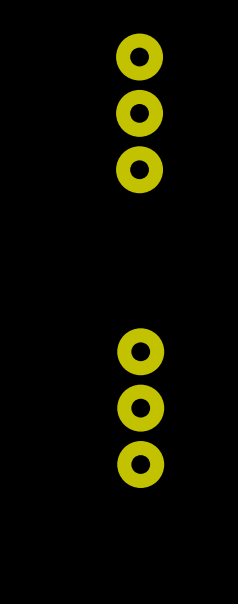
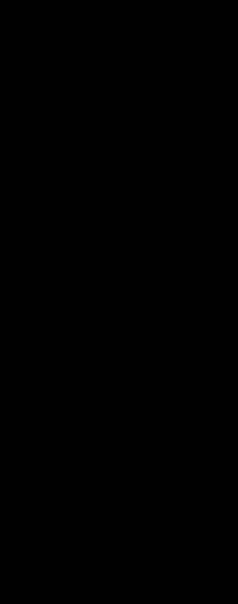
part: (139, 113) -> none
part: (140, 408) -> none

